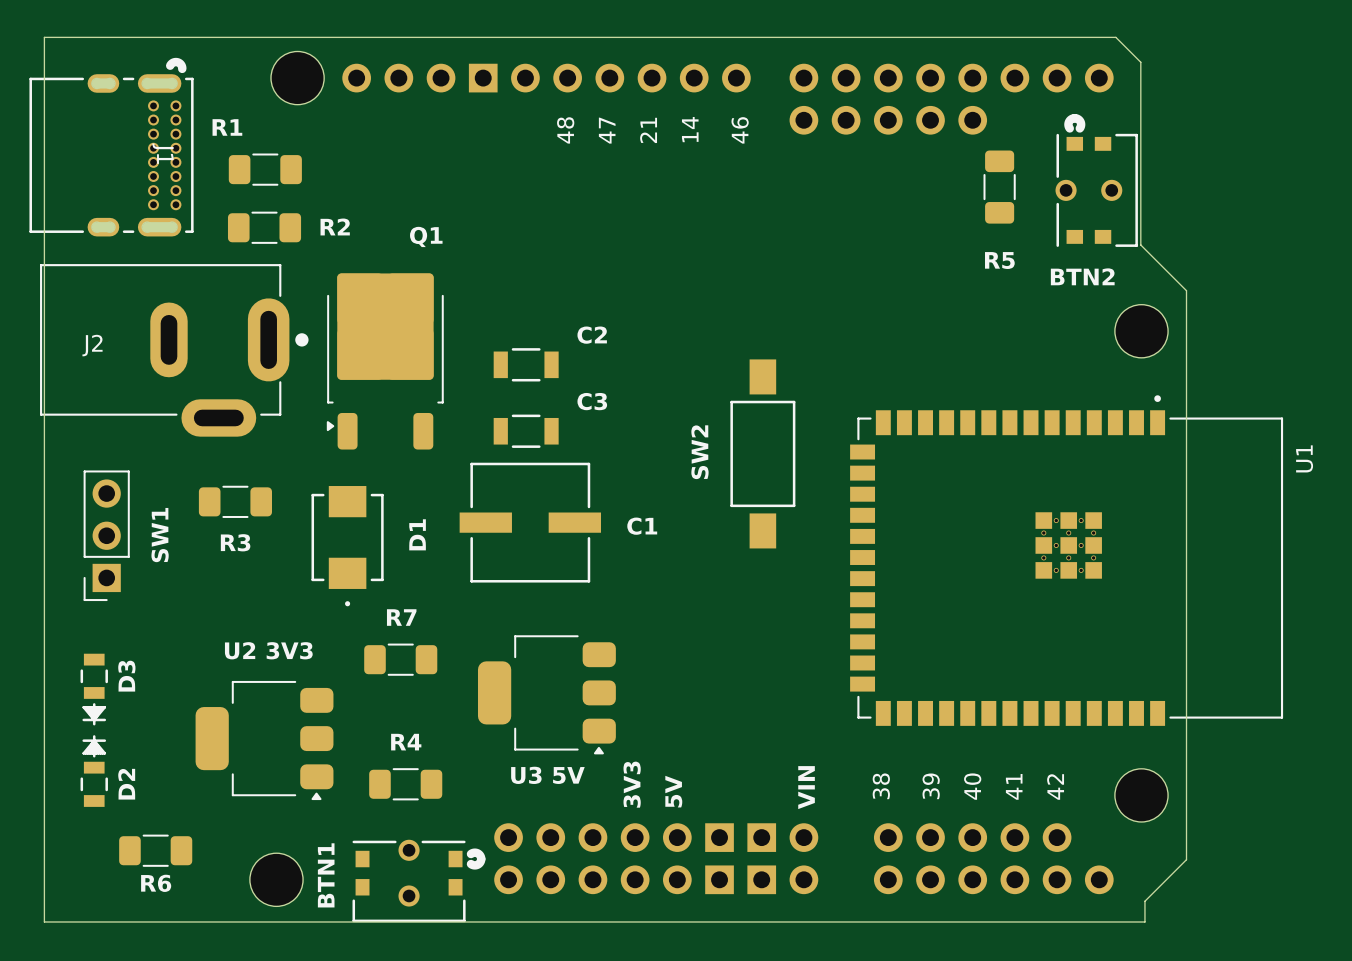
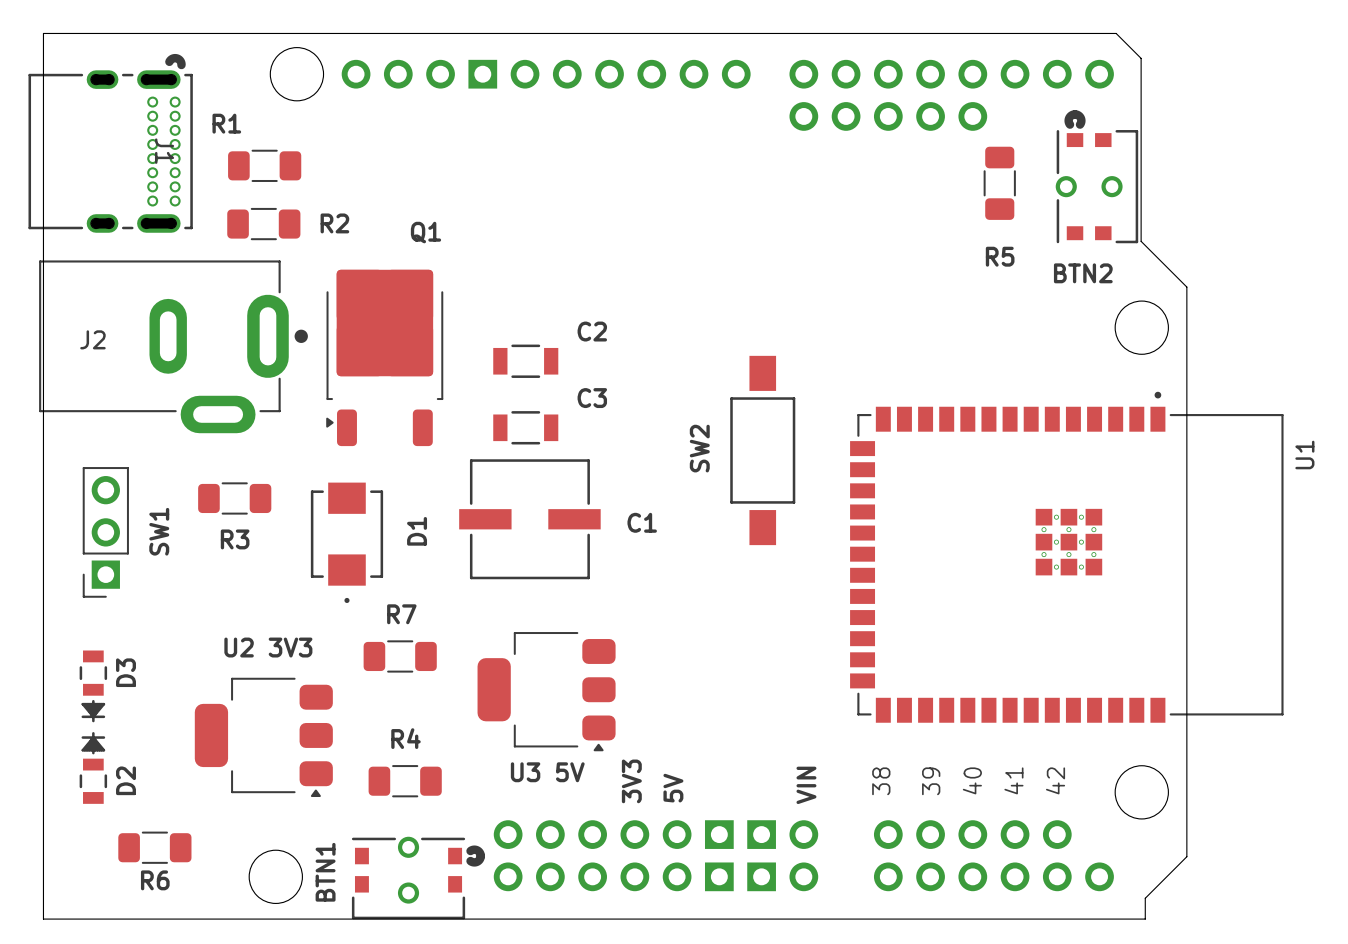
text: 14 (690, 129) -> none
text: 48 (565, 130) -> none
text: 47 (607, 130) -> none
text: 21 (648, 130) -> none
text: 46 (740, 130) -> none

